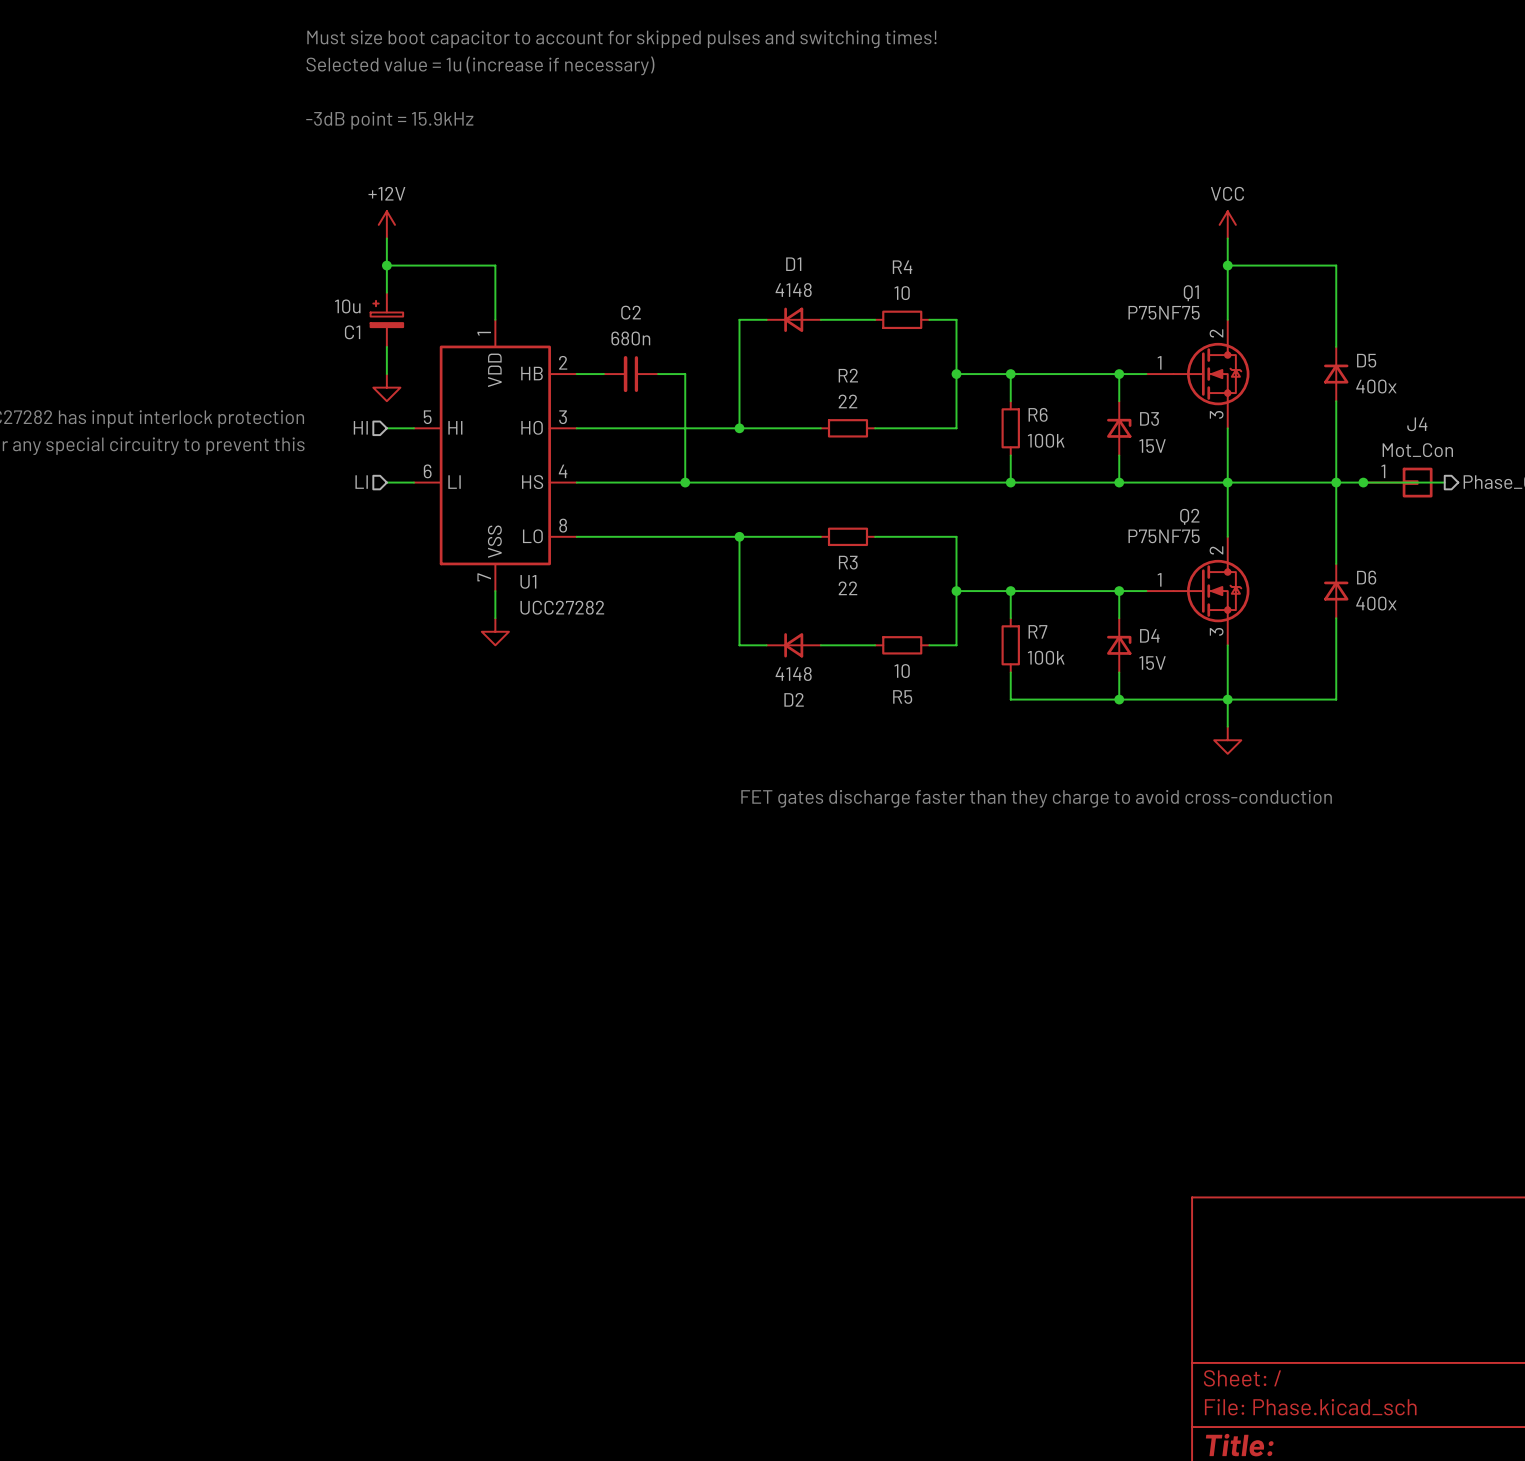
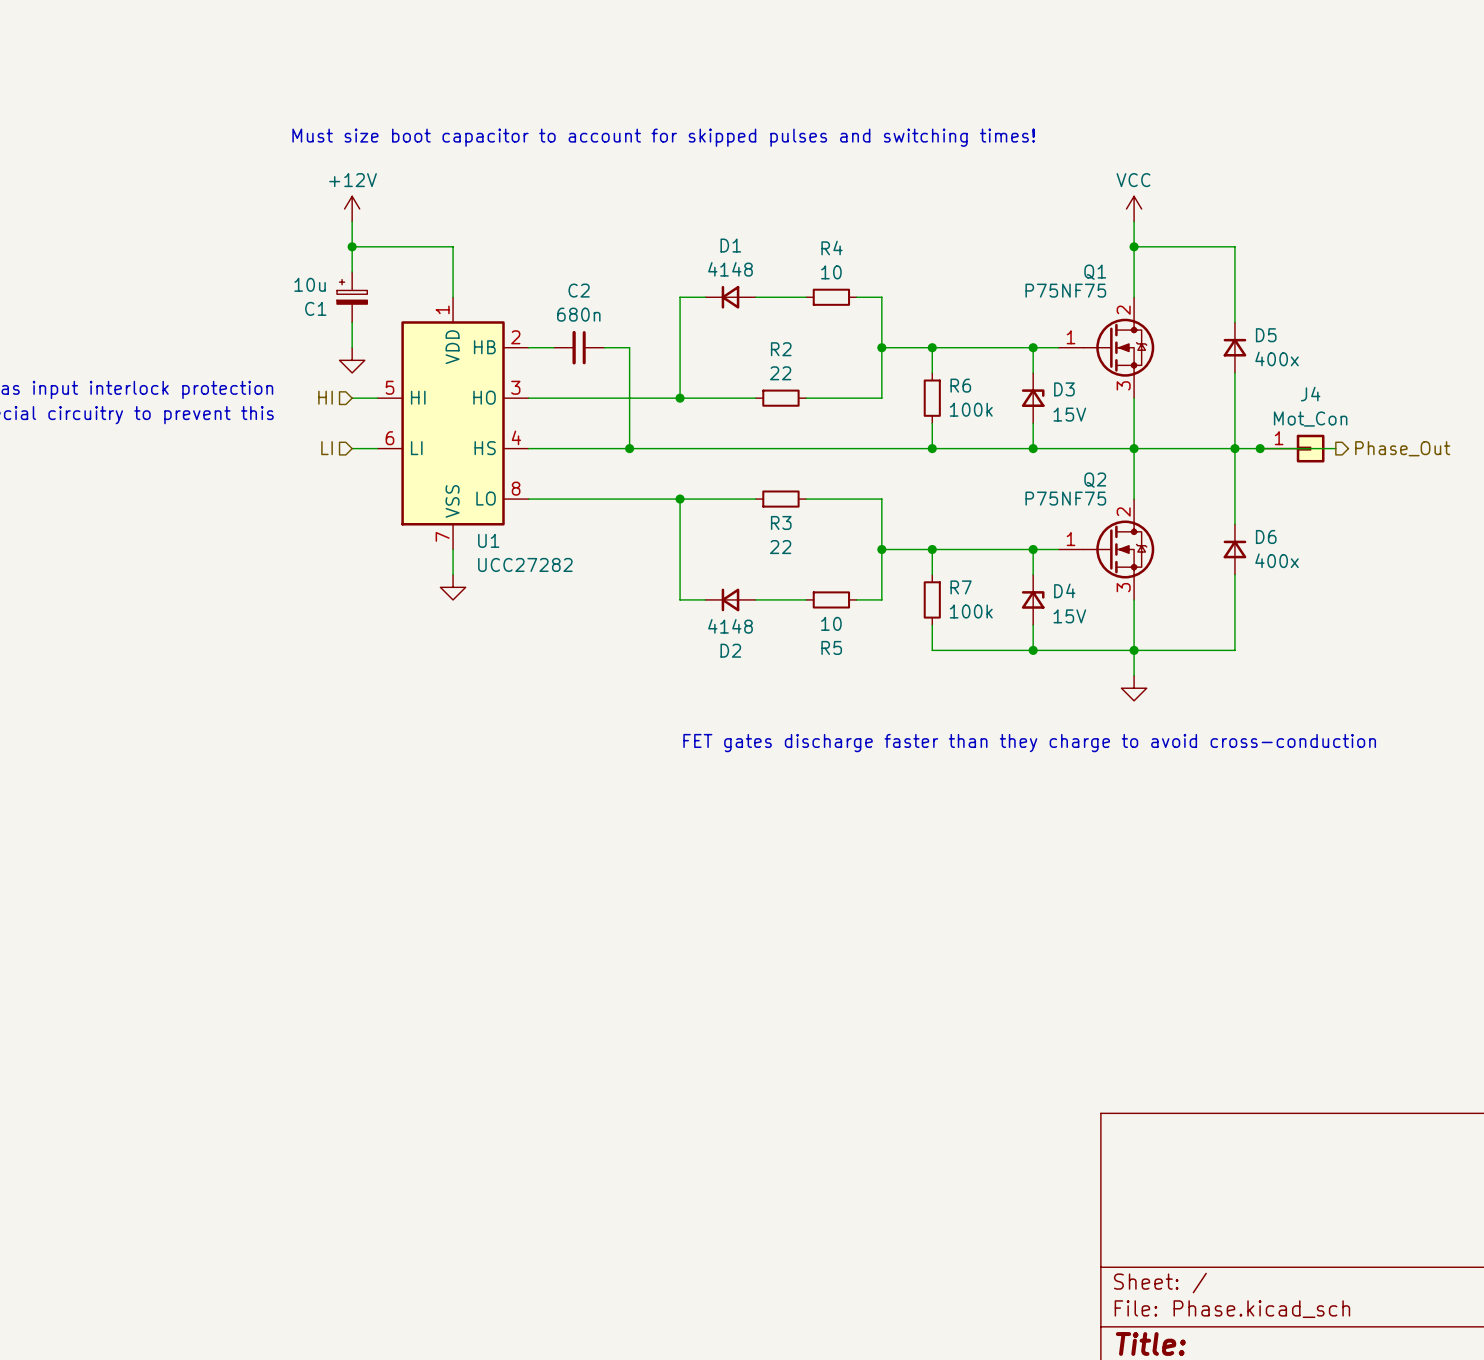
text position: Must size boot capacitor to account for skipped pulses and switching times! (621, 39) -> Must size boot capacitor to account for skipped pulses and switching times! (663, 137)
text: Selected value = 1u (increase if necessary) (480, 65) -> none
text: -3dB point = 15.9kHz (389, 120) -> none

